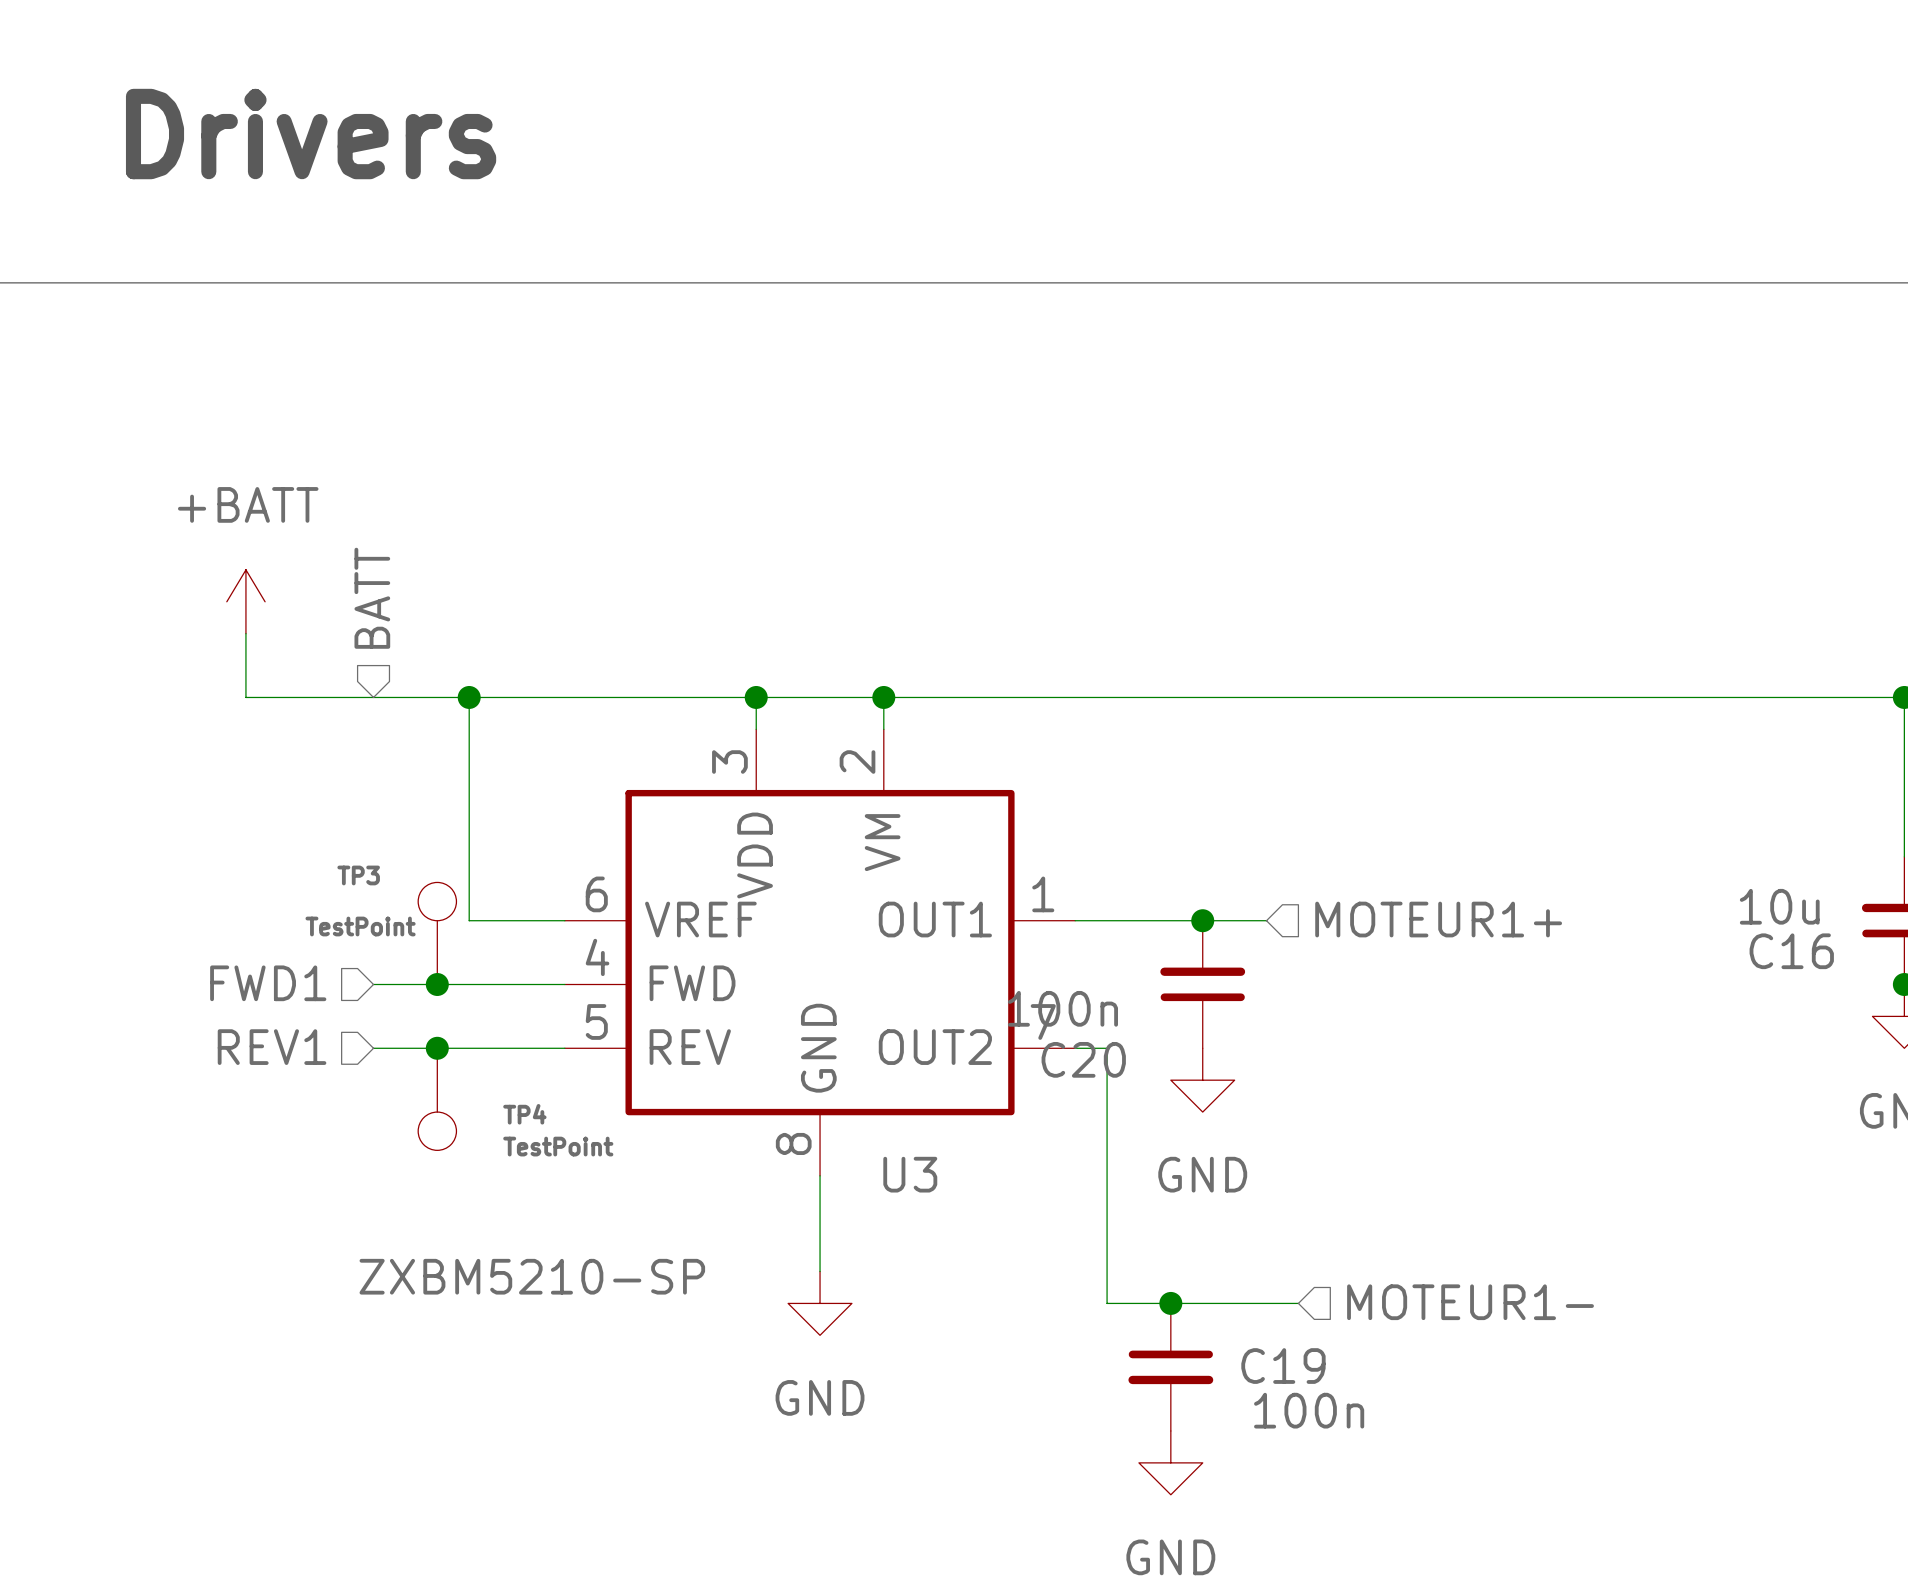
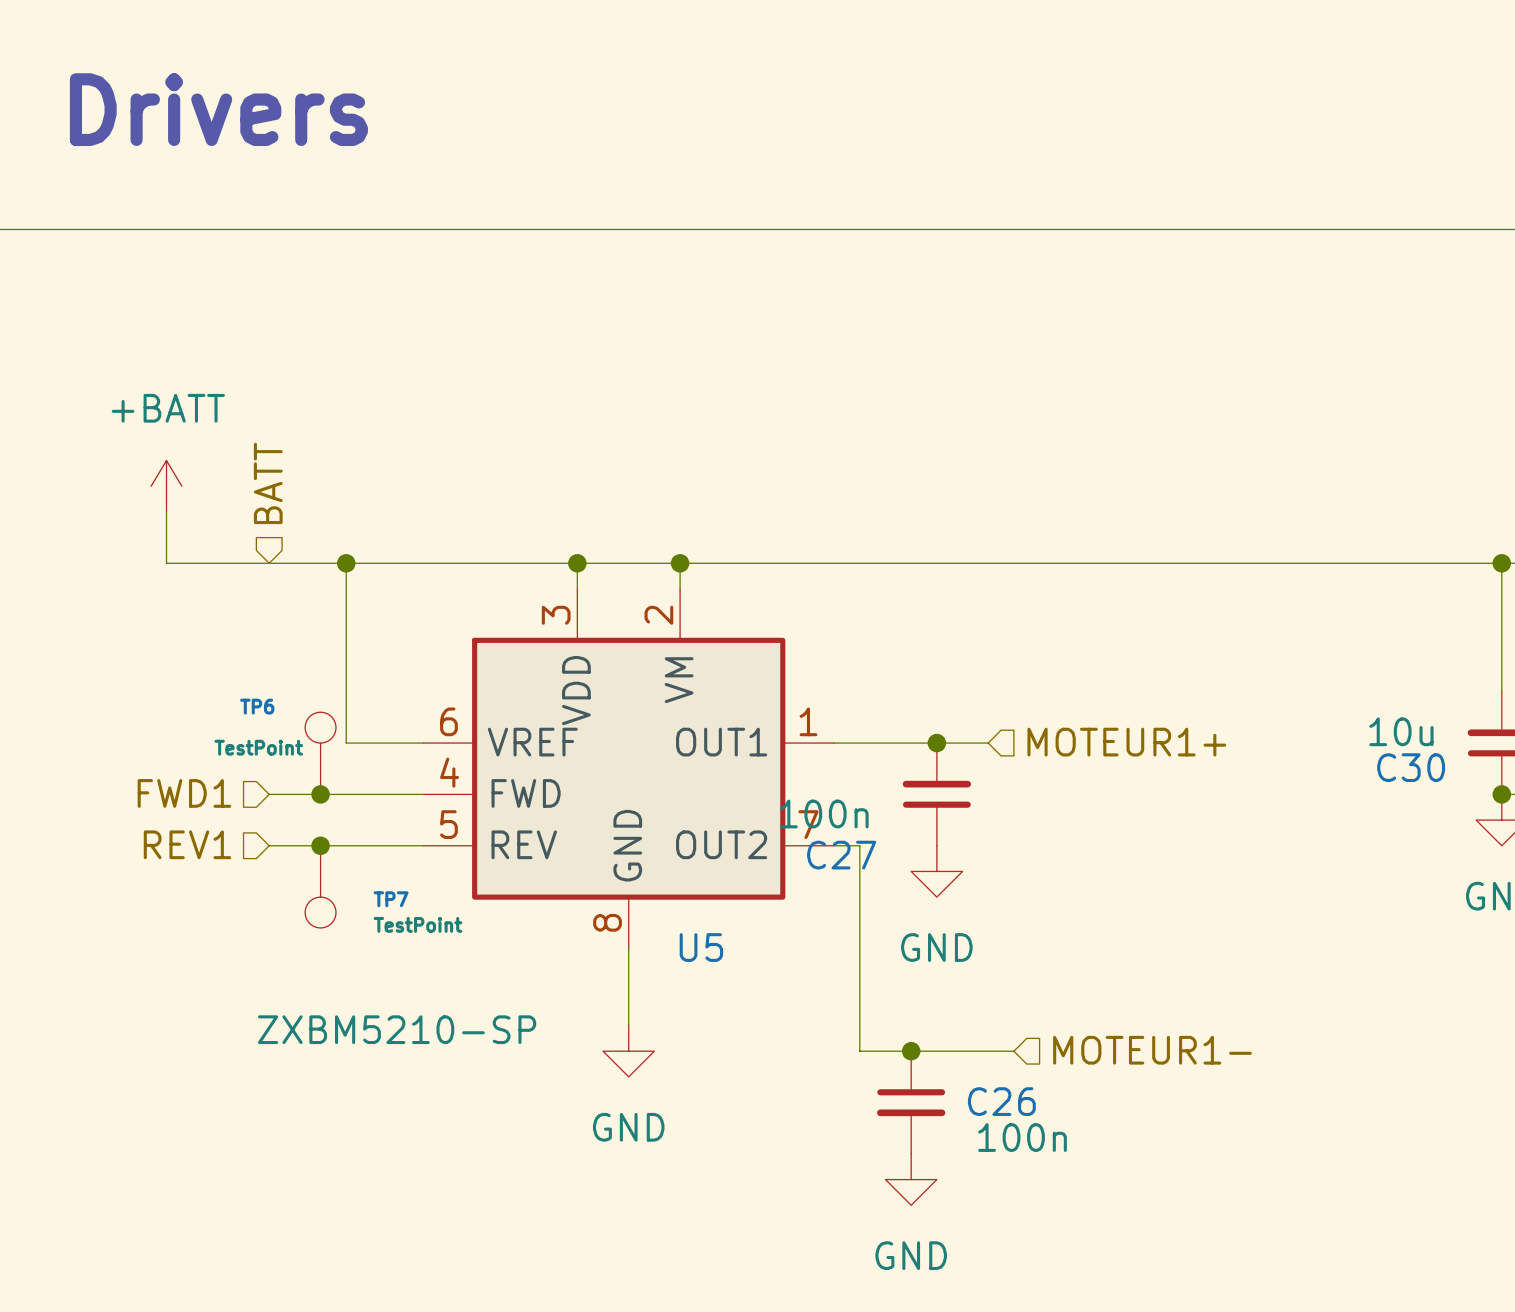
TP3 name: TP3 (358, 875) -> TP6 (257, 706)
C16 name: C16 (1791, 951) -> C30 (1411, 767)
C20 name: C20 (1083, 1059) -> C27 (841, 855)
TP4 name: TP4 (524, 1114) -> TP7 (391, 899)
U3 name: U3 (910, 1174) -> U5 (701, 947)
C19 name: C19 (1283, 1366) -> C26 (1001, 1101)

